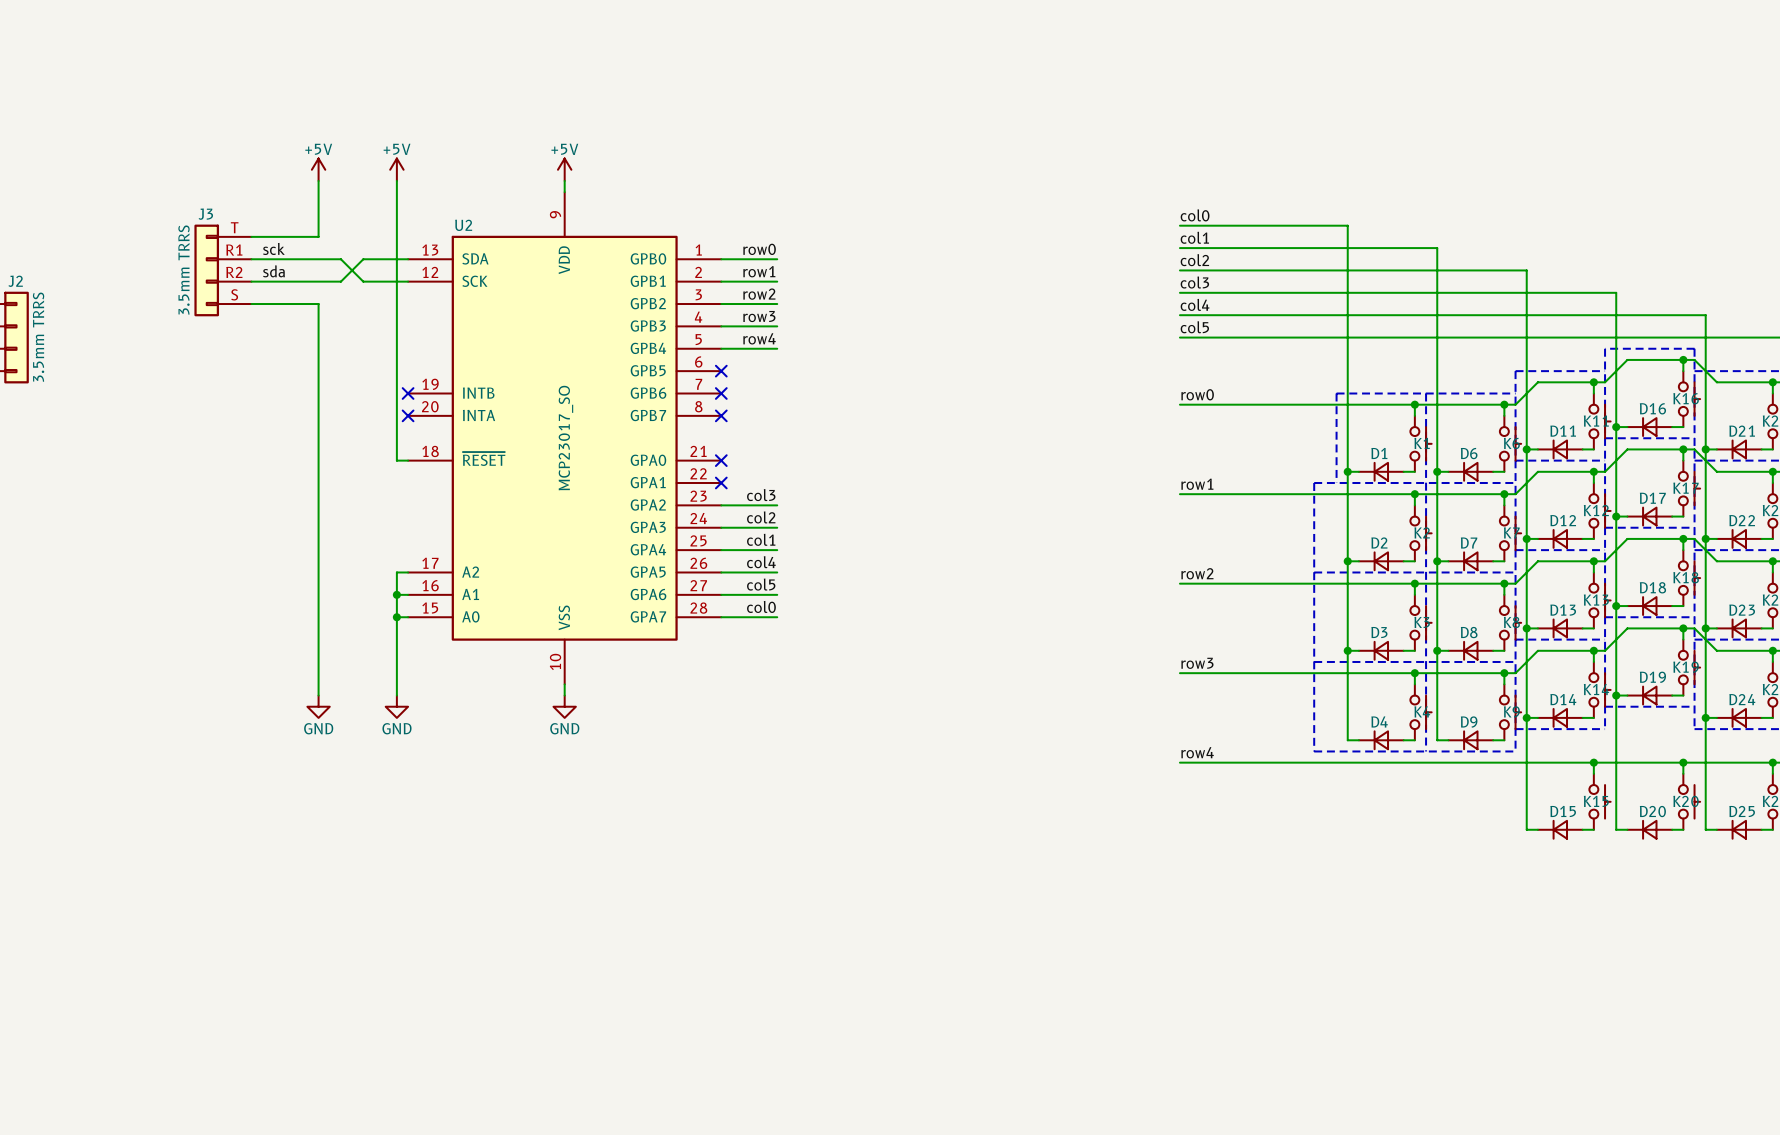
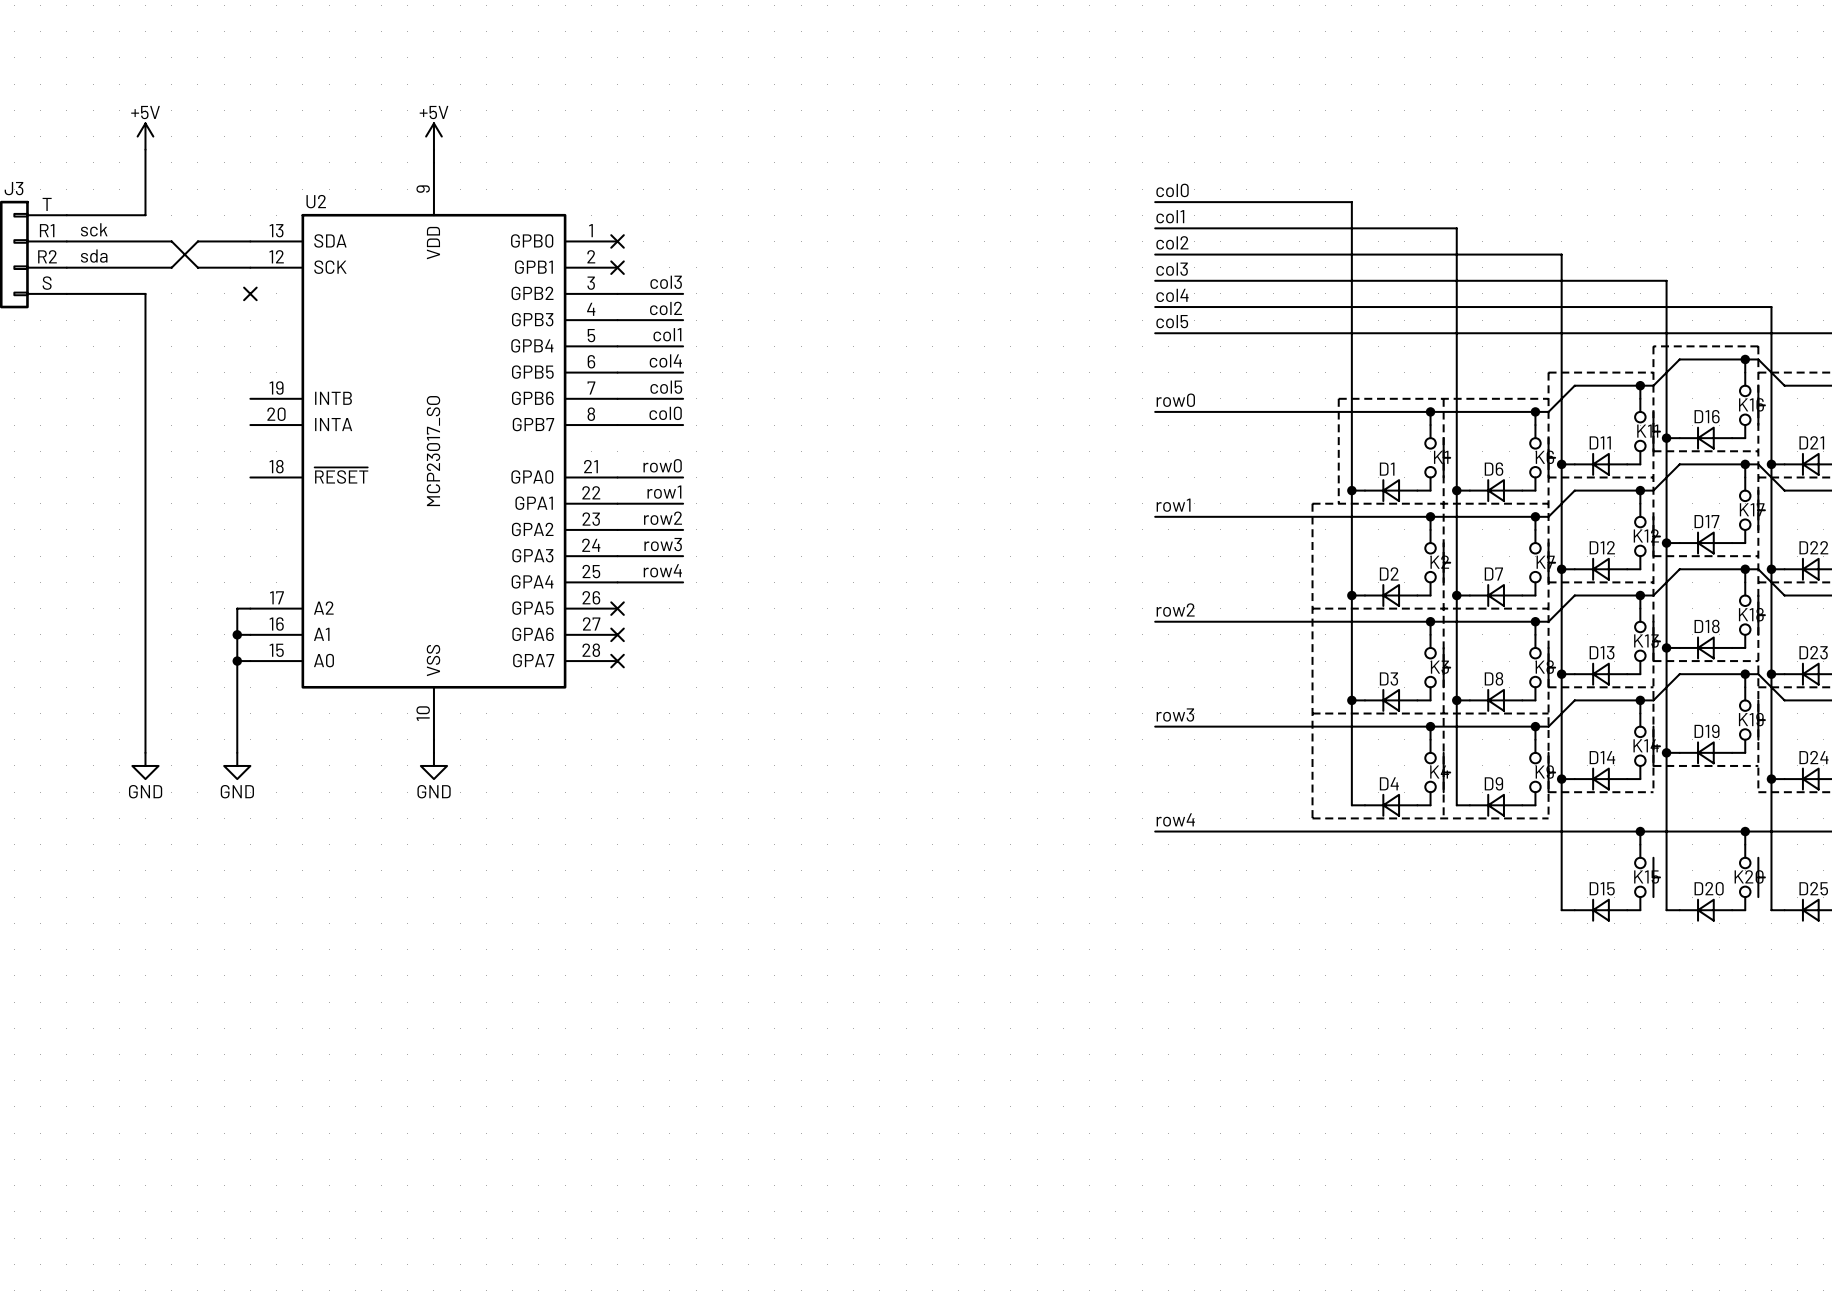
power symbol: +5V (396, 169) -> none
wire: (396, 180) (396, 460) (408, 460) -> none
label position: row0 (759, 249) -> row0 (662, 465)
wire: (721, 259) (777, 259) -> (617, 477) (683, 477)
no-connect mark: none -> (617, 241)
label position: row1 (759, 271) -> row1 (664, 492)
wire: (721, 281) (777, 281) -> (617, 503) (683, 503)
no-connect mark: none -> (617, 267)
label: row2 (759, 294) -> col3 (666, 282)
no-connect mark: none -> (250, 293)
label: row3 (759, 316) -> col2 (666, 308)
label: row4 (759, 338) -> col1 (667, 334)
no-connect mark: (721, 371) -> none
no-connect mark: (408, 393) -> none
no-connect mark: (721, 393) -> none
no-connect mark: (408, 415) -> none
no-connect mark: (721, 415) -> none
no-connect mark: (721, 460) -> none
no-connect mark: (721, 482) -> none
label: col3 (761, 495) -> row2 (663, 518)
label: col2 (761, 517) -> row3 (663, 544)
label: col1 (761, 539) -> row4 (662, 570)
label position: col4 (761, 562) -> col4 (665, 360)
wire: (721, 572) (777, 572) -> (617, 372) (683, 372)
no-connect mark: none -> (617, 608)
label position: col5 (761, 584) -> col5 (666, 387)
wire: (721, 594) (777, 594) -> (617, 398) (683, 398)
no-connect mark: none -> (617, 634)
label position: col0 (761, 606) -> col0 (665, 413)
wire: (721, 617) (777, 617) -> (617, 425) (683, 425)
no-connect mark: none -> (617, 661)

